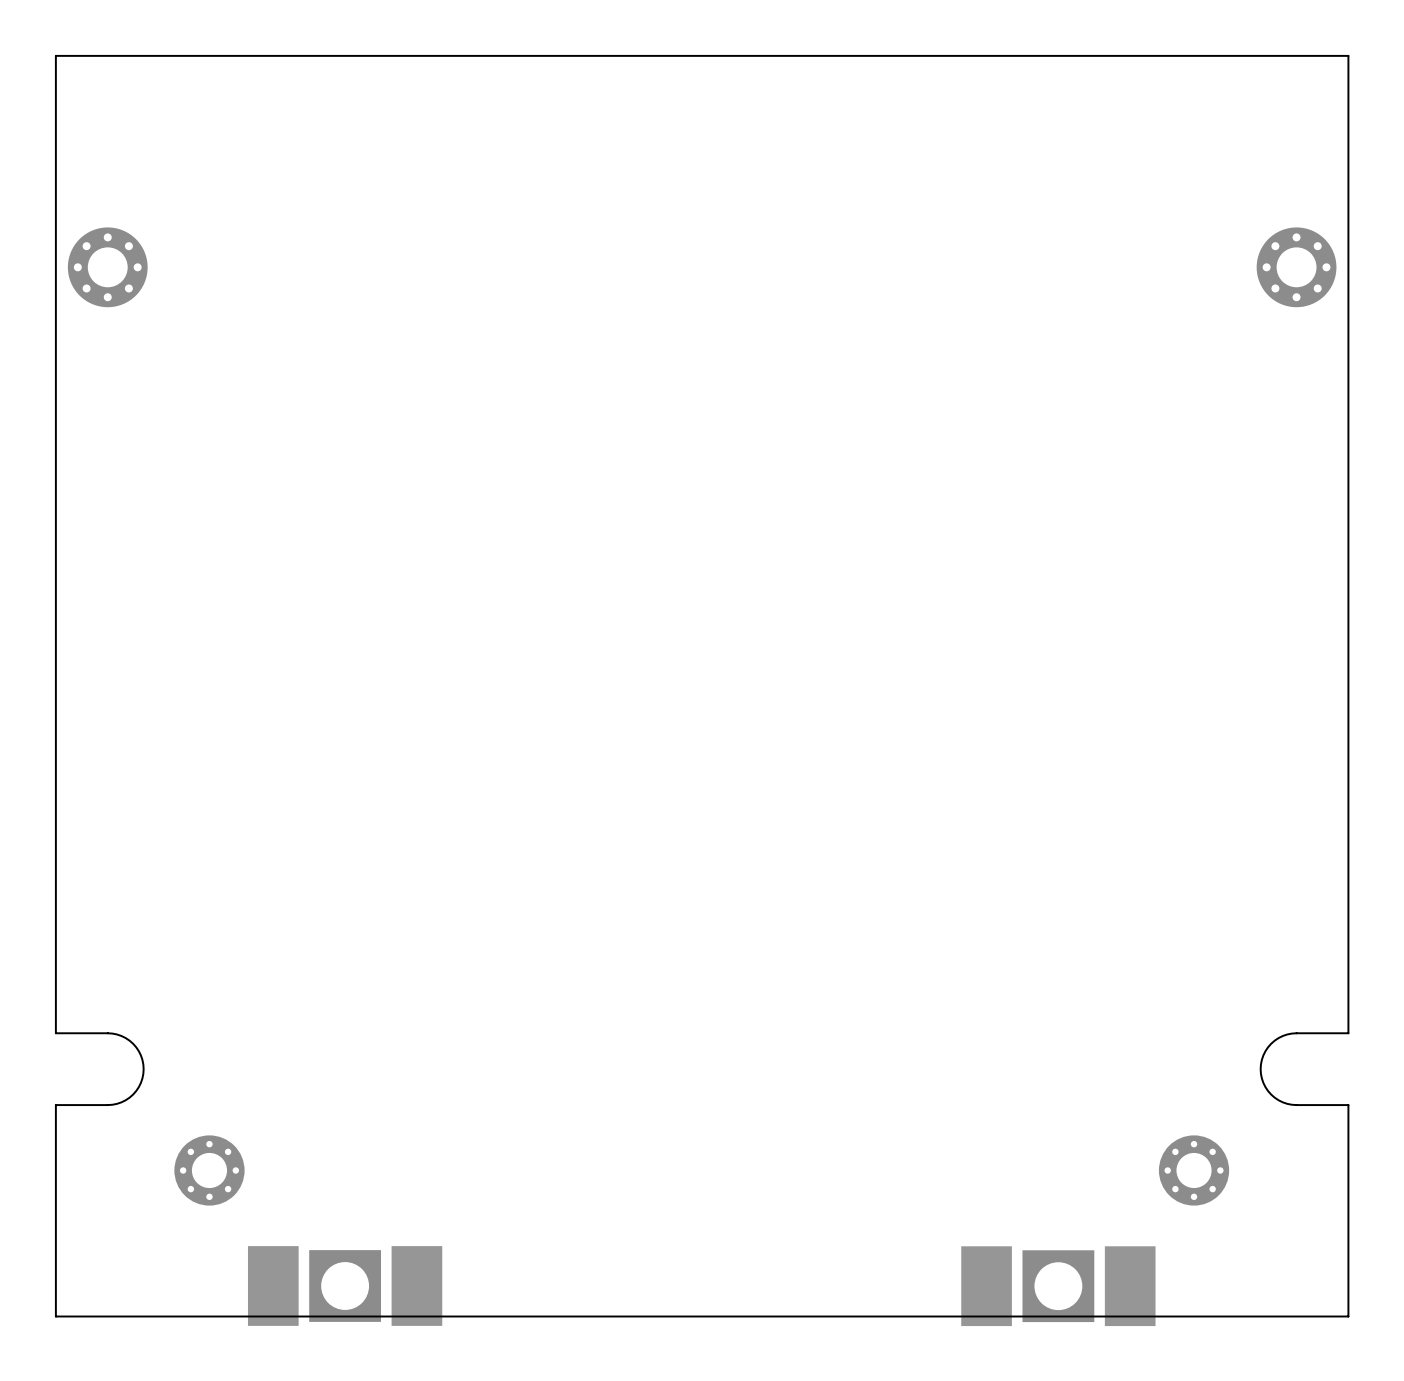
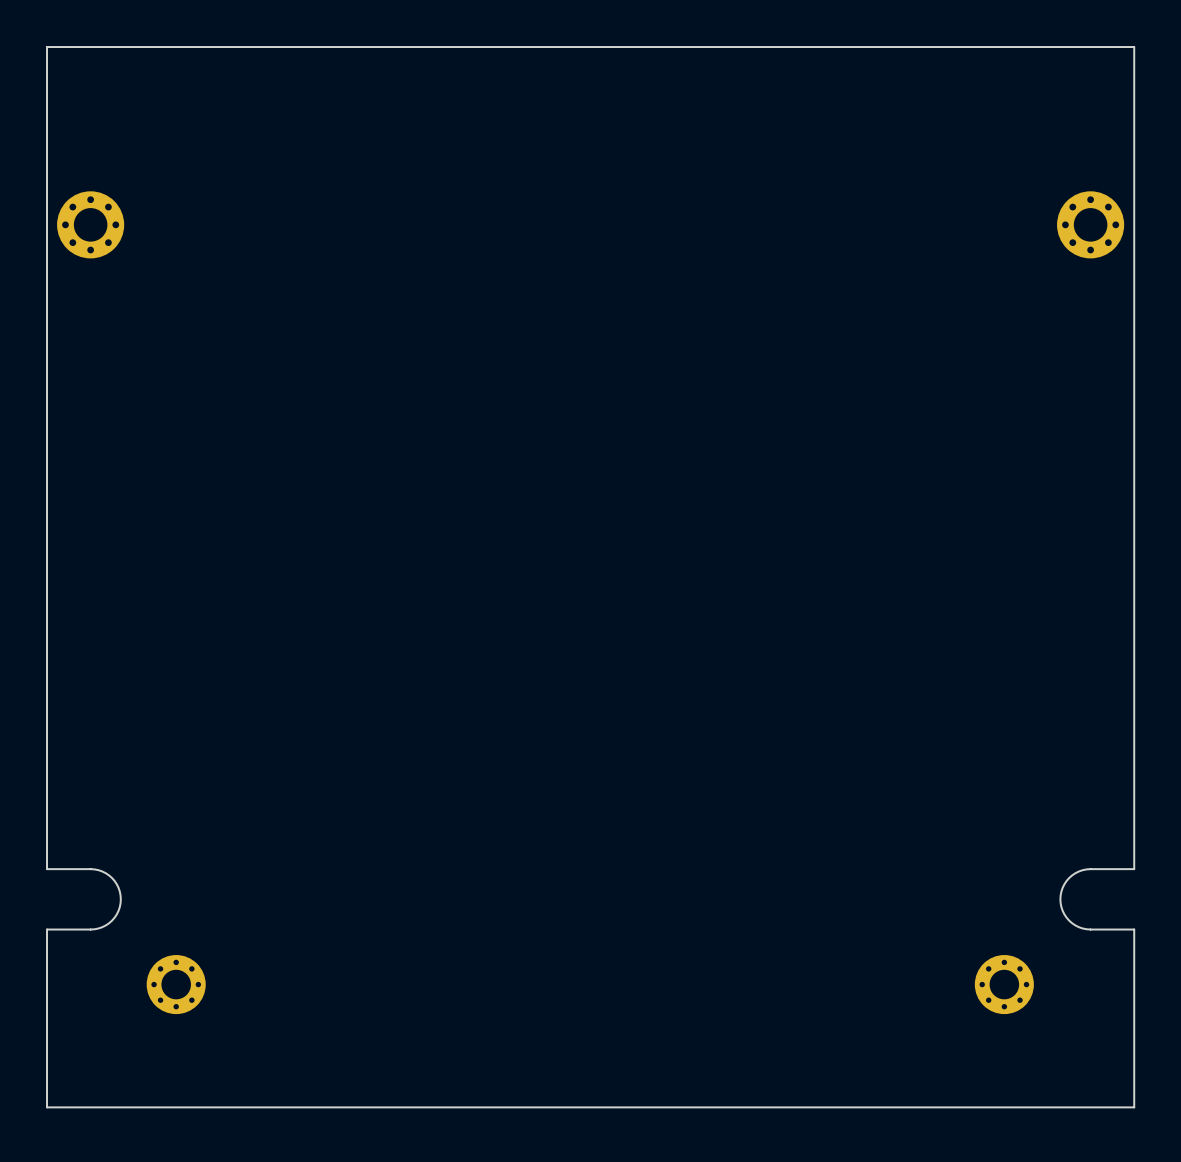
part: (345, 1286) -> none
part: (1058, 1286) -> none

